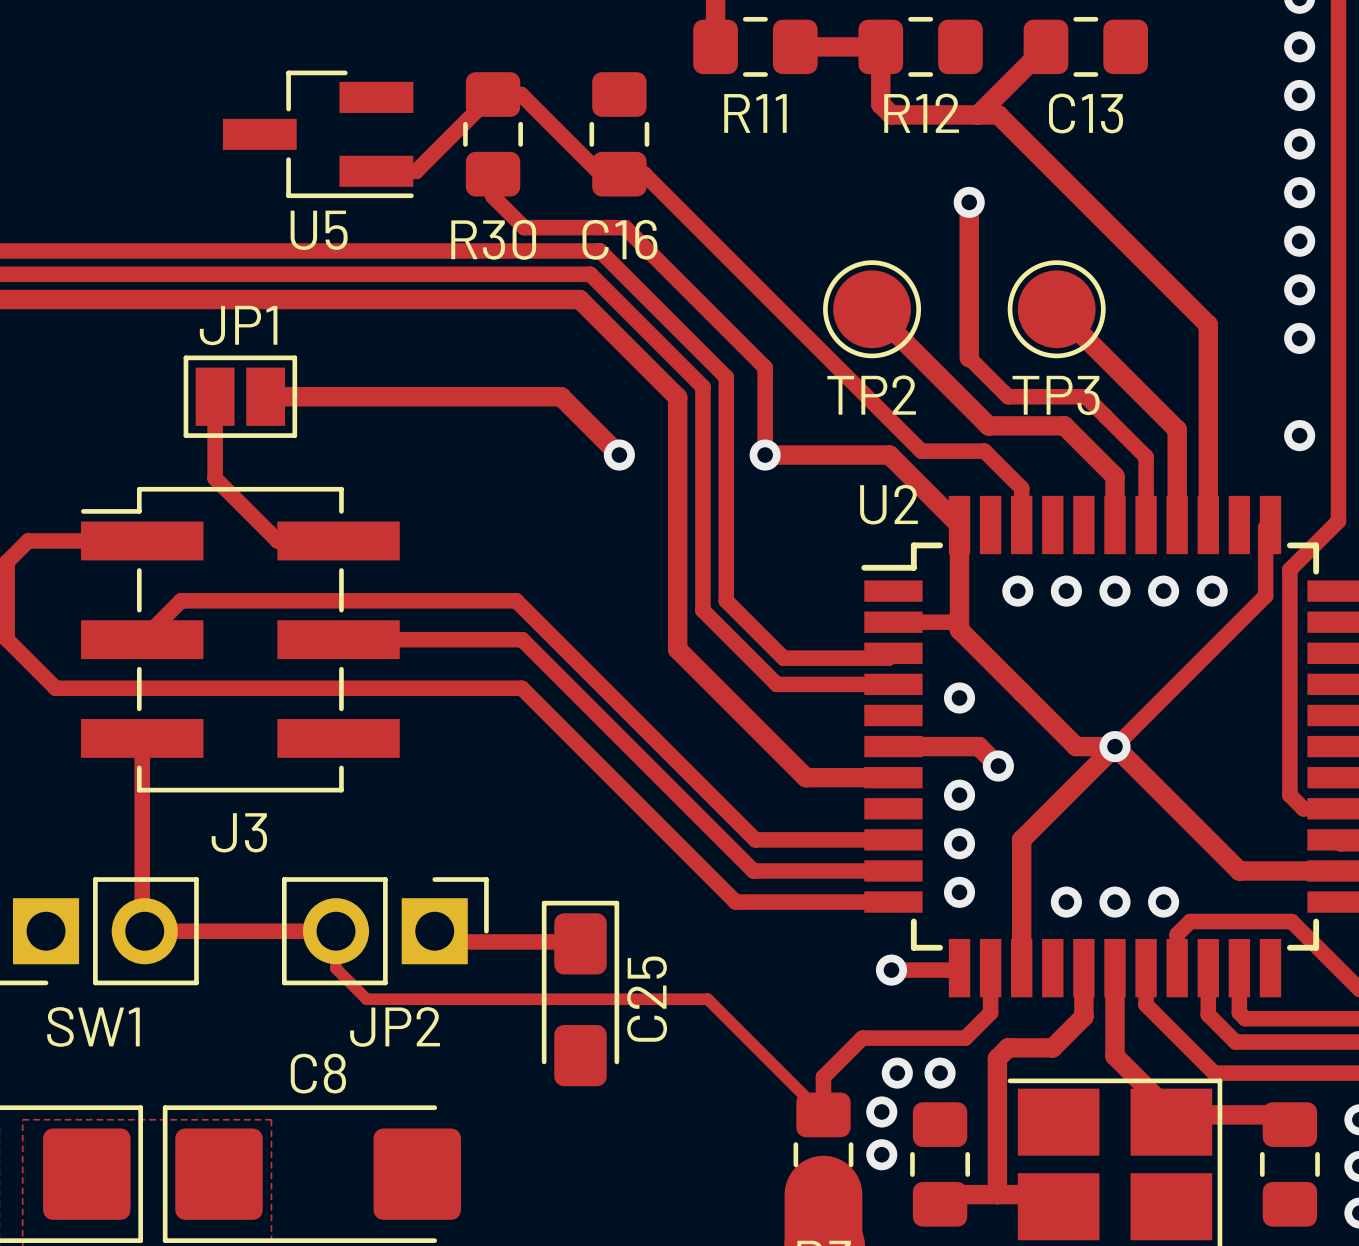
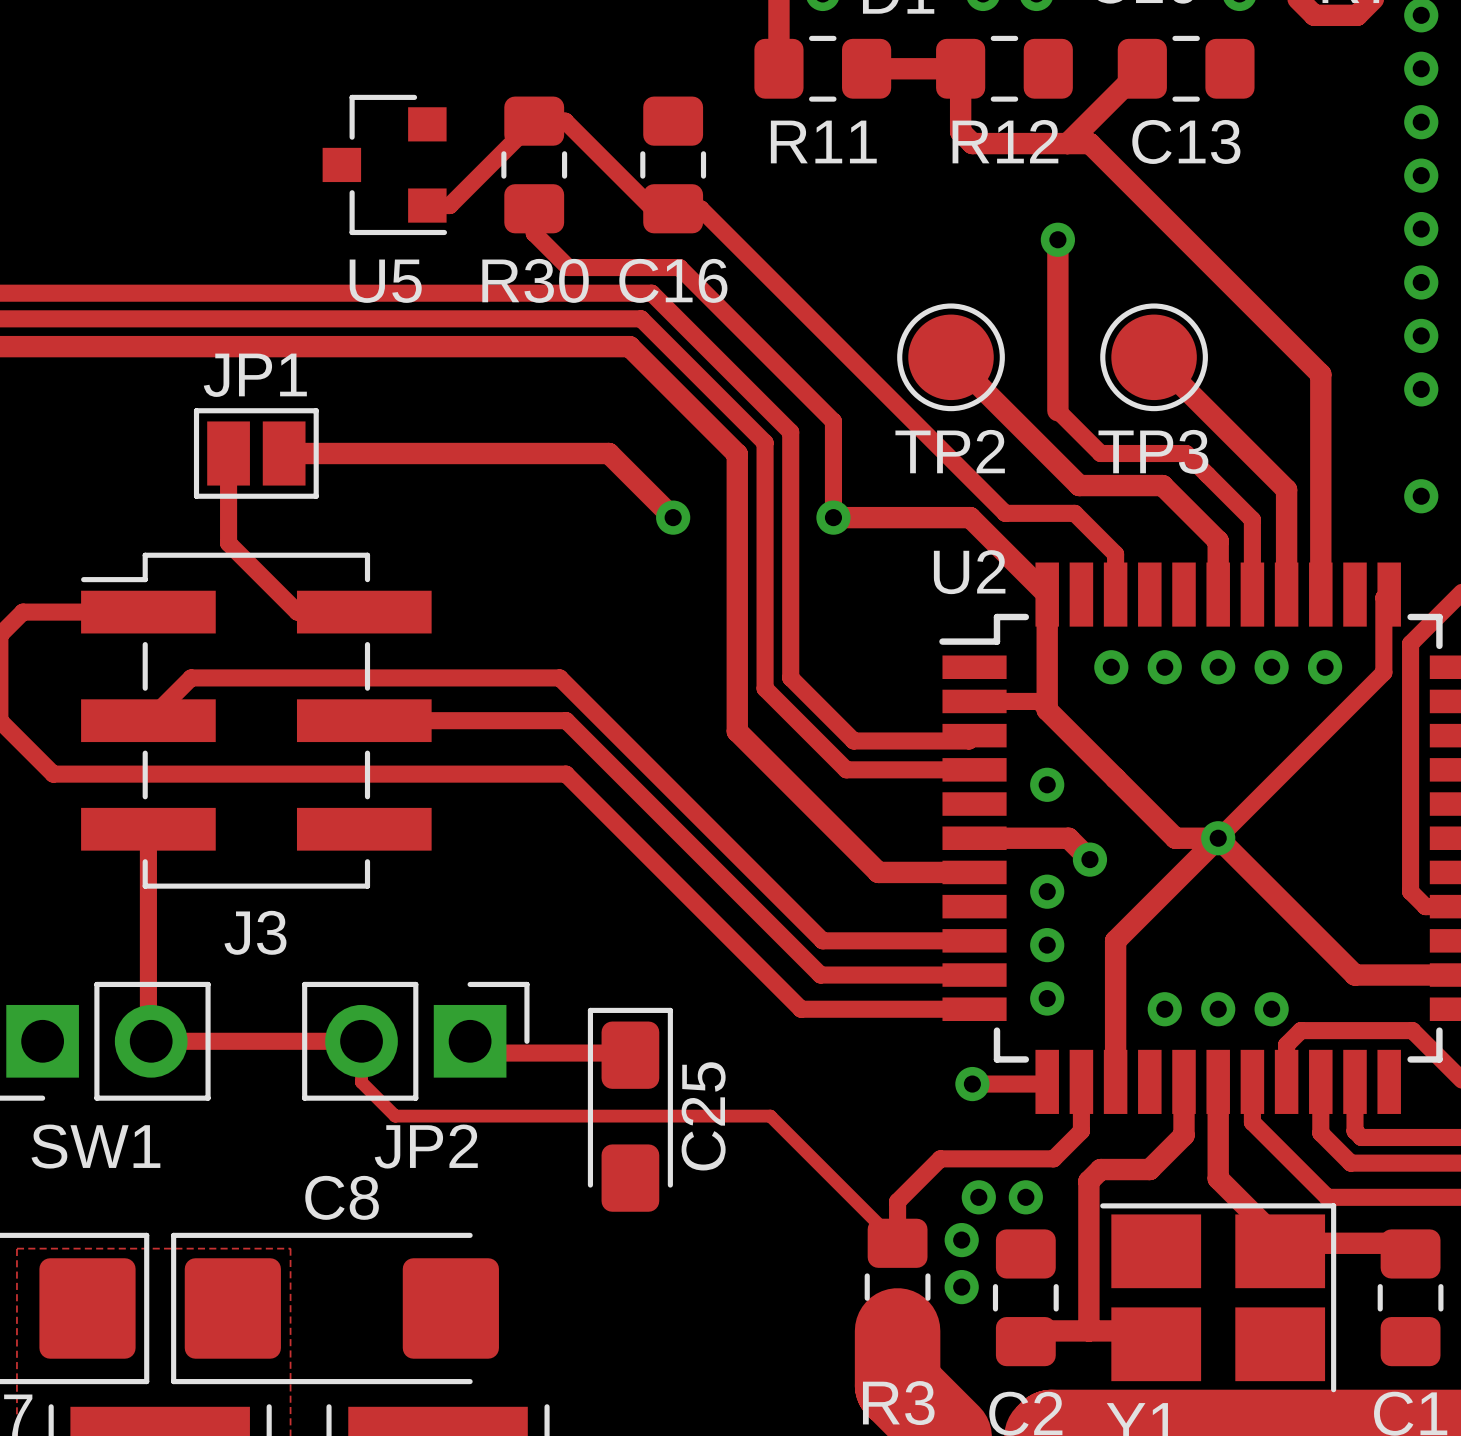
U5 footprint: [222, 70, 414, 199] -> [322, 94, 448, 236]

